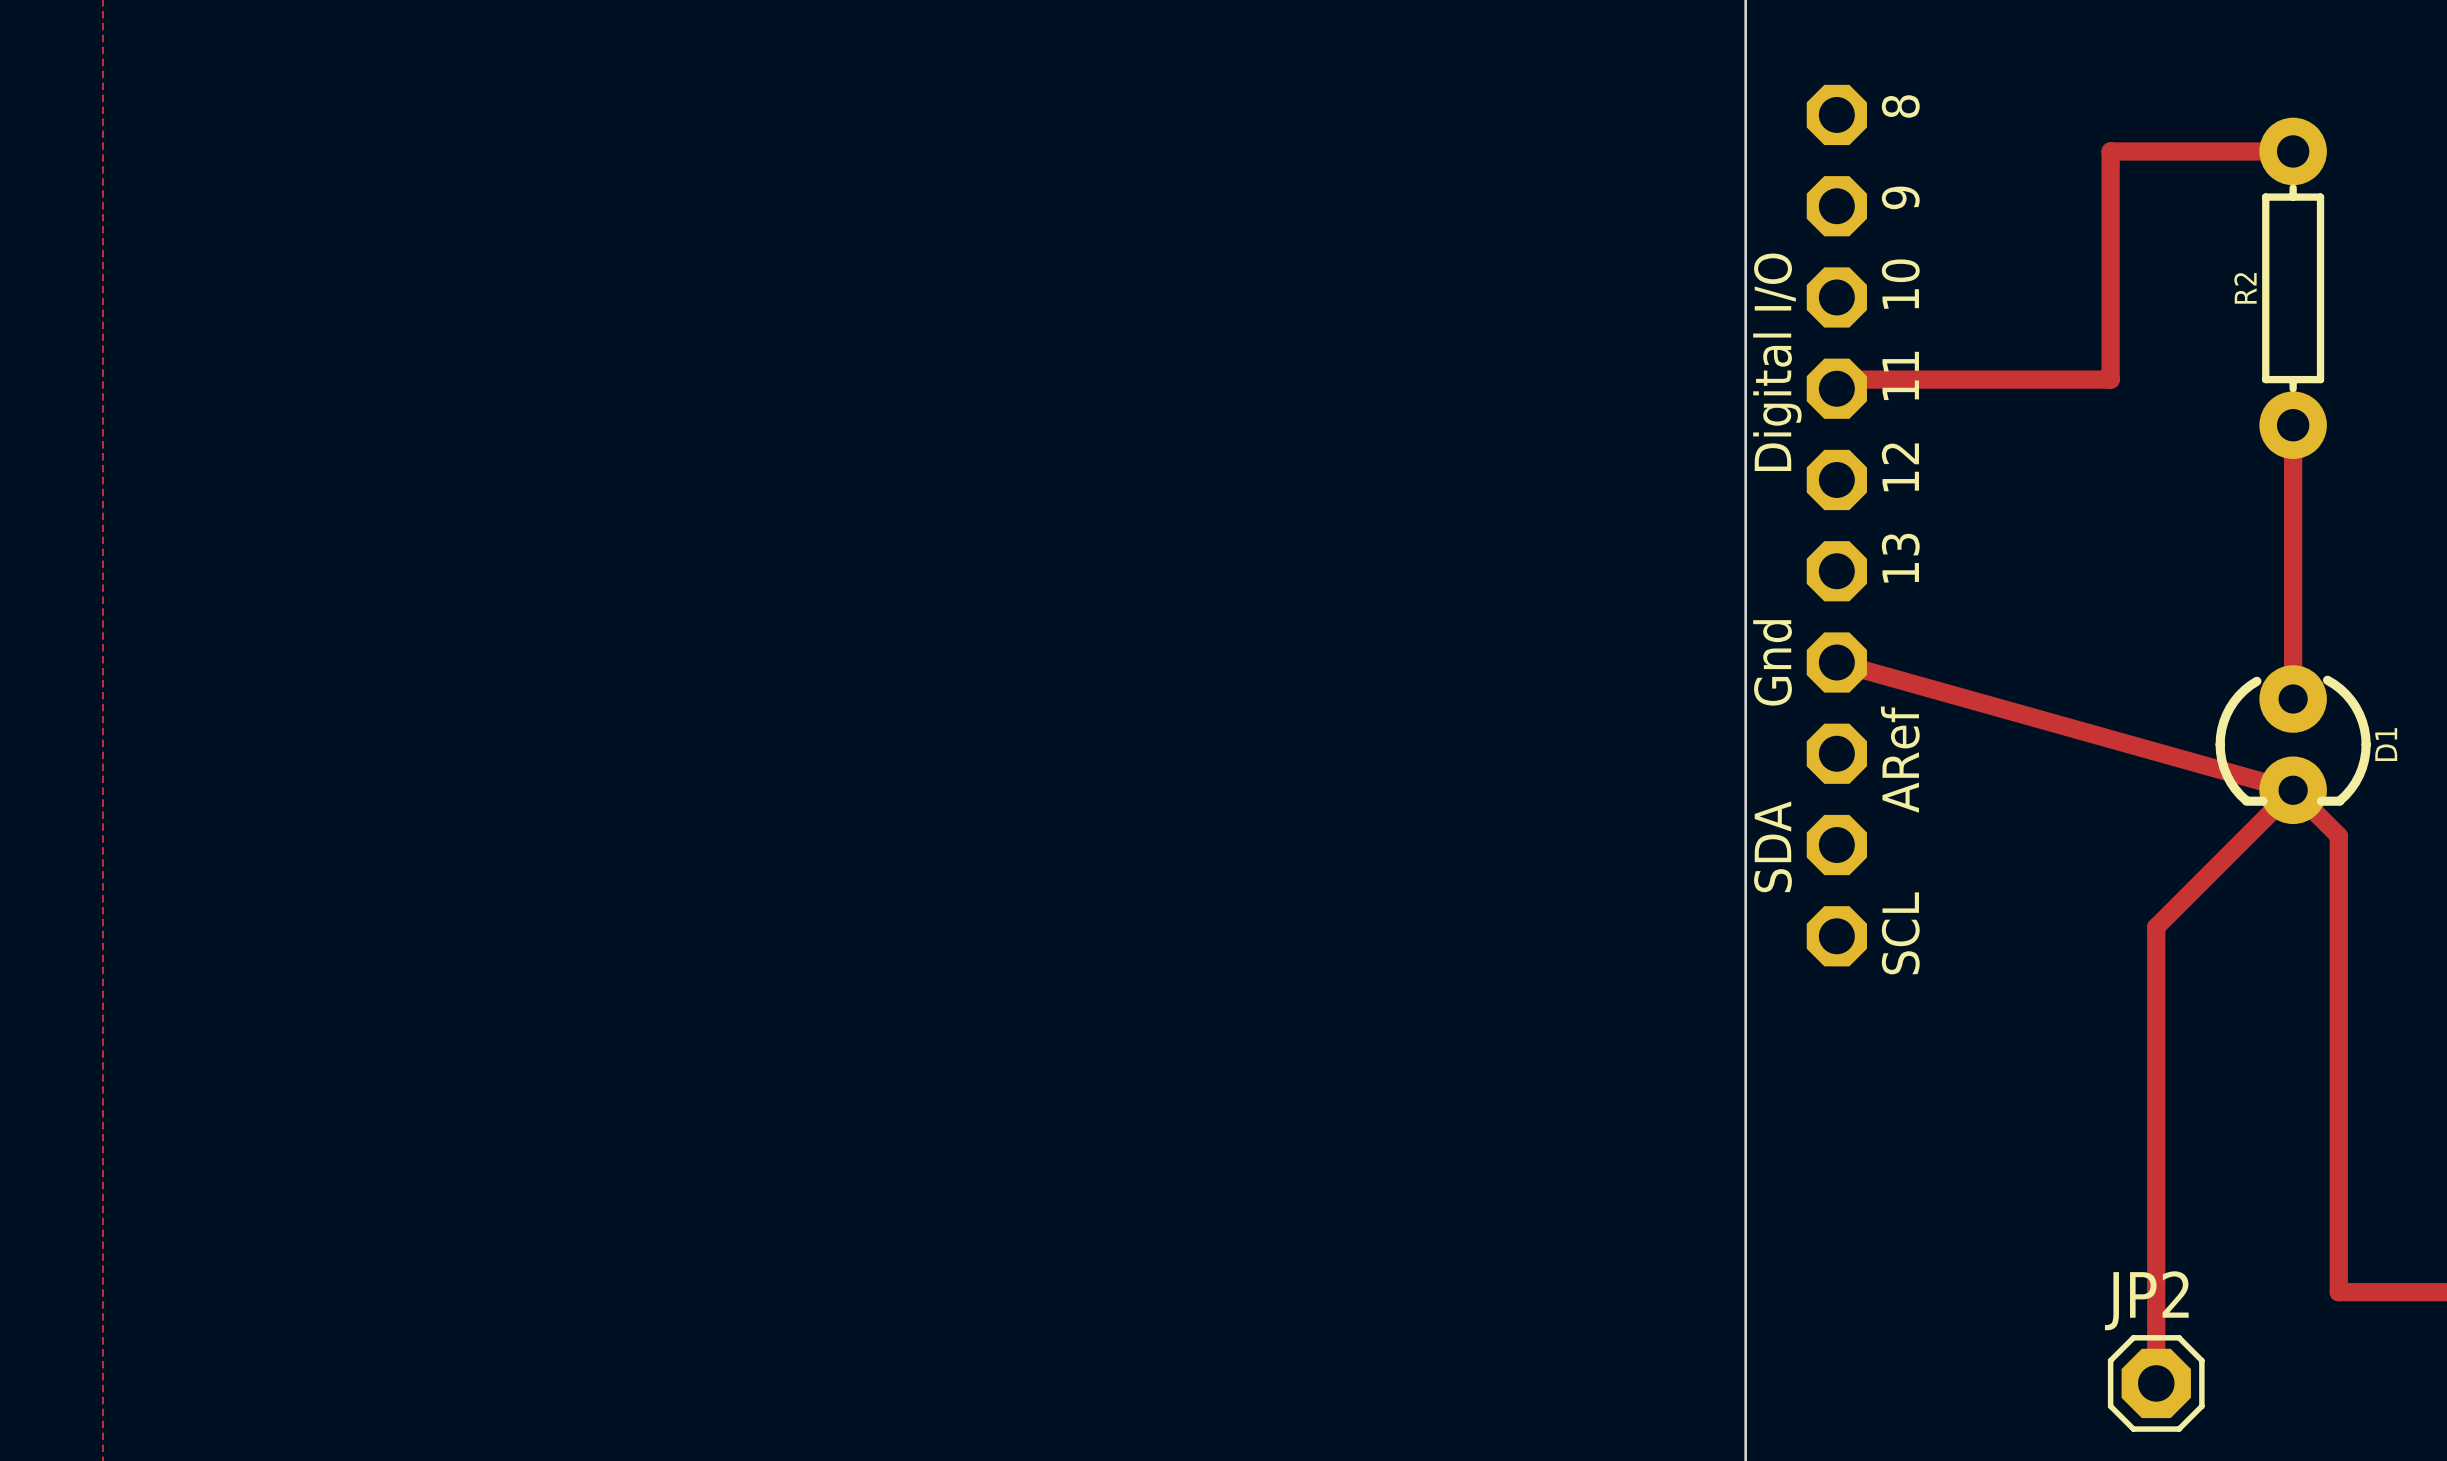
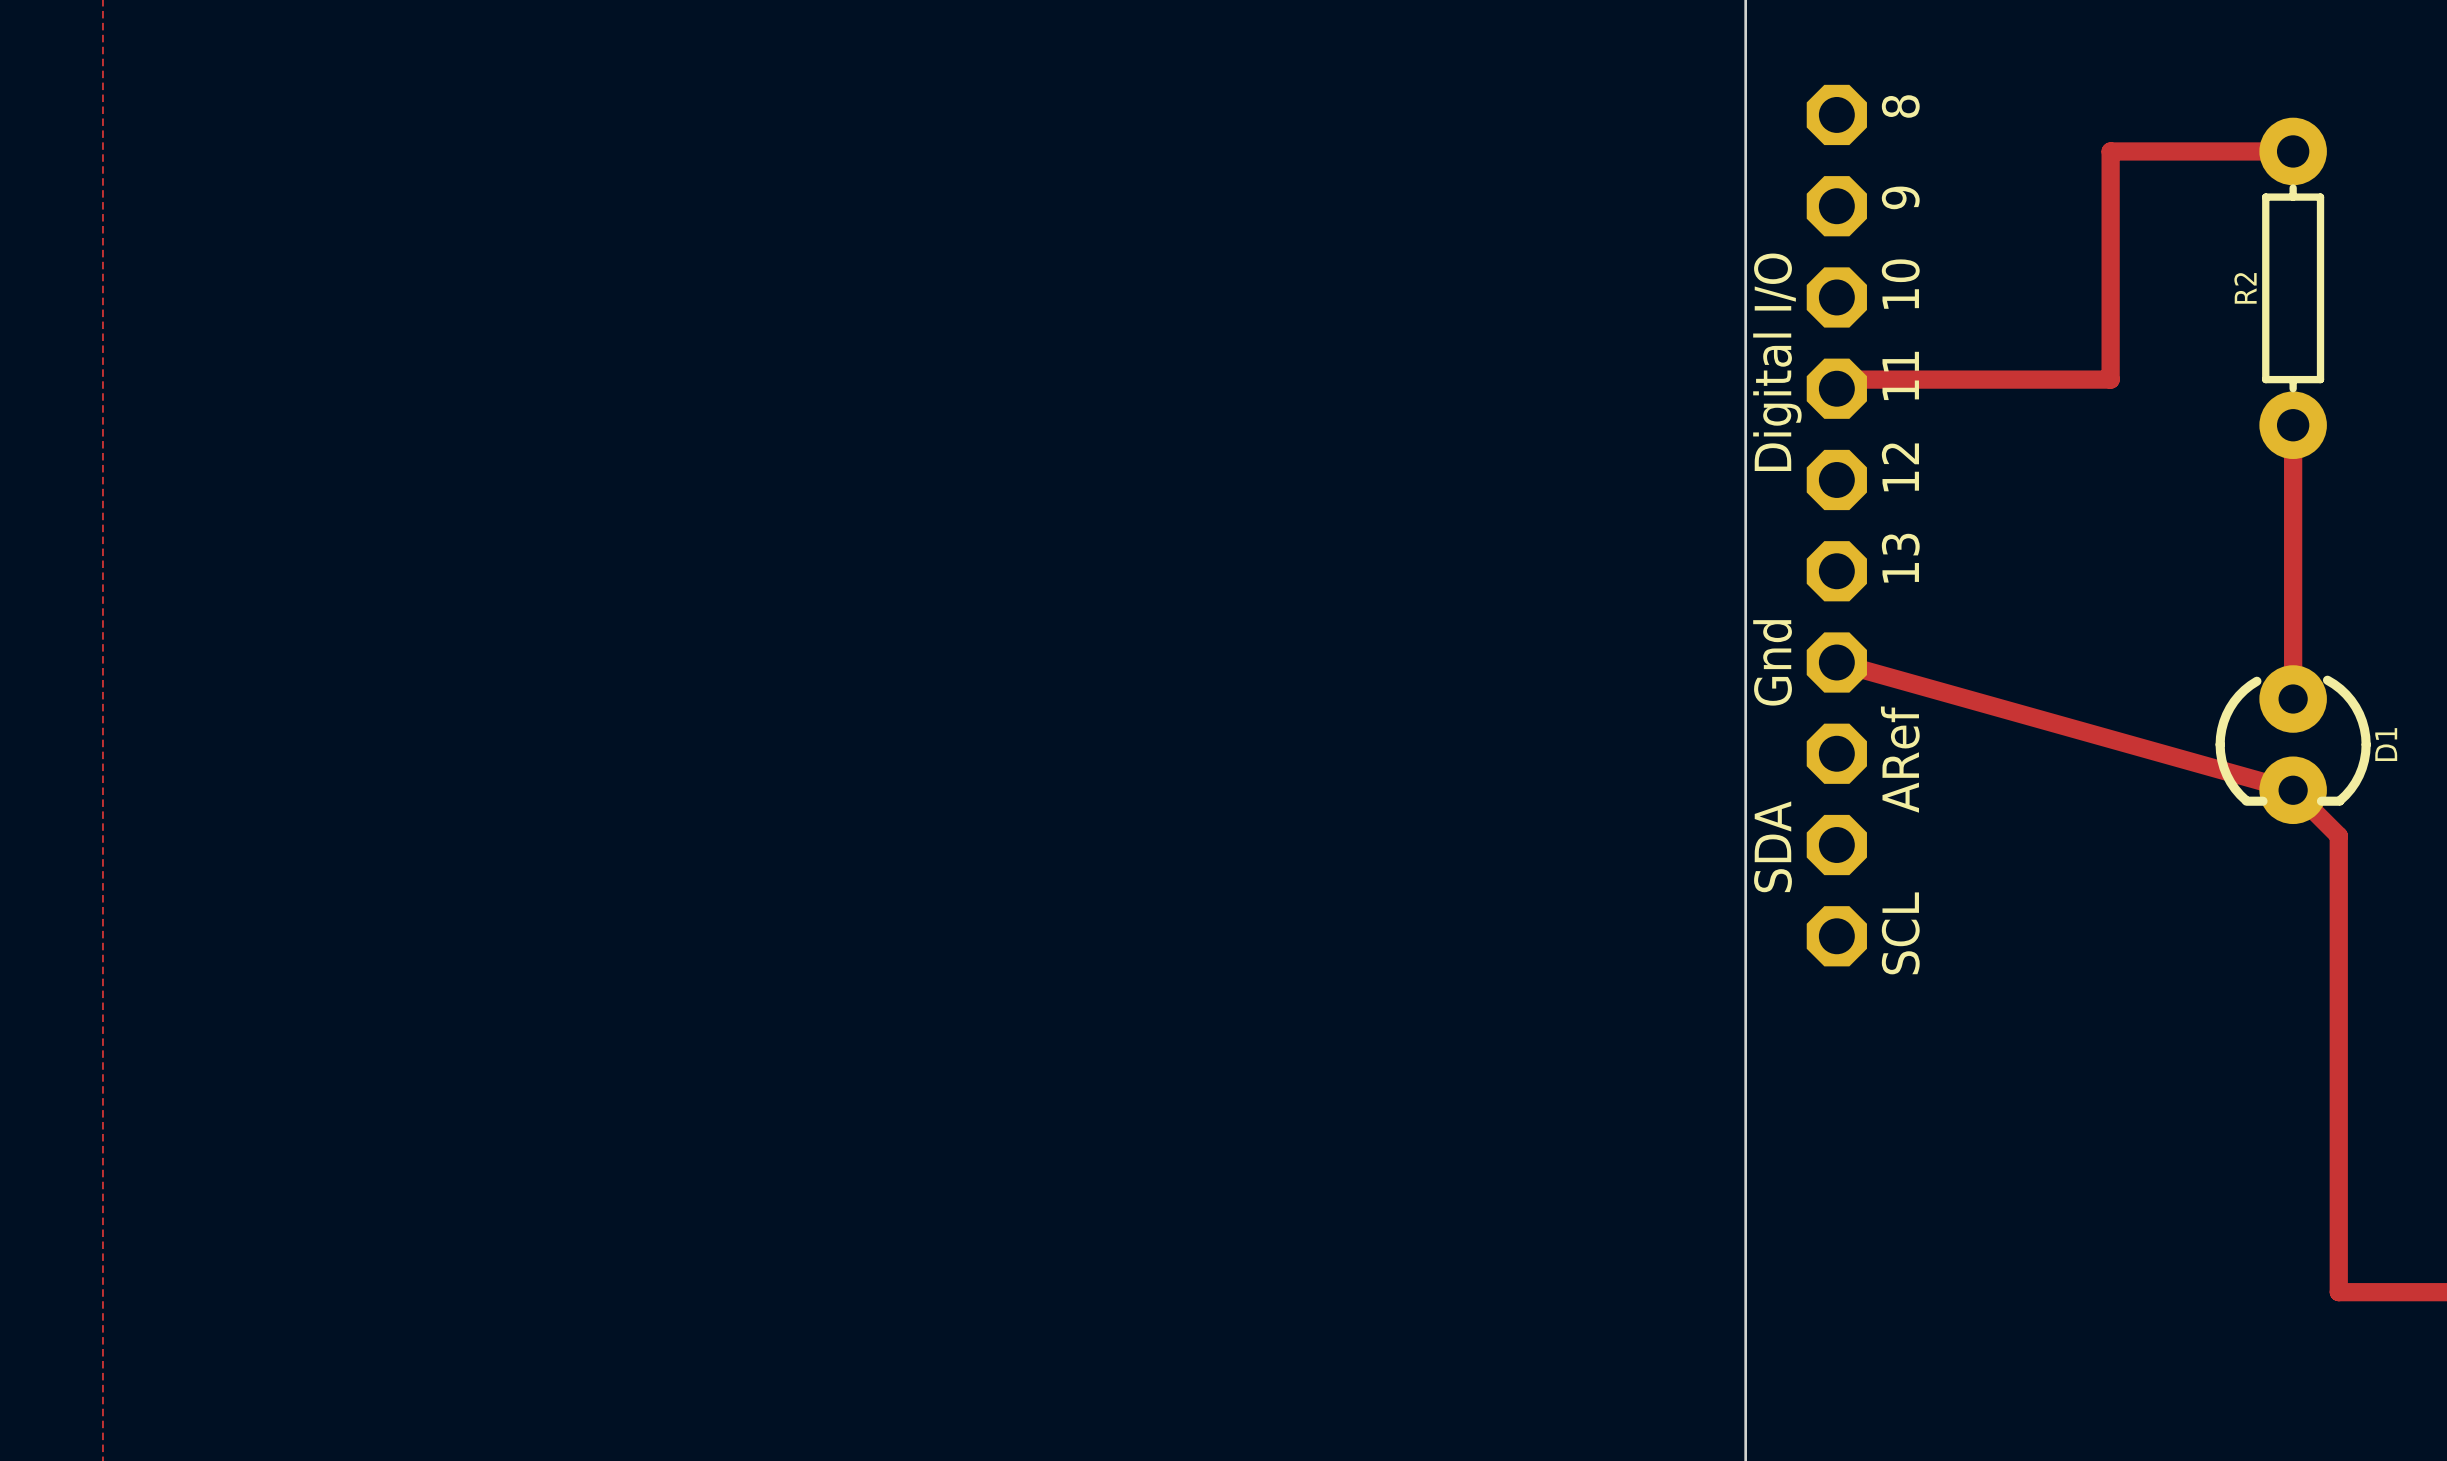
track: (2293, 790) (2156, 927) (2156, 1383) -> none
JP2: (2156, 1383) -> none

